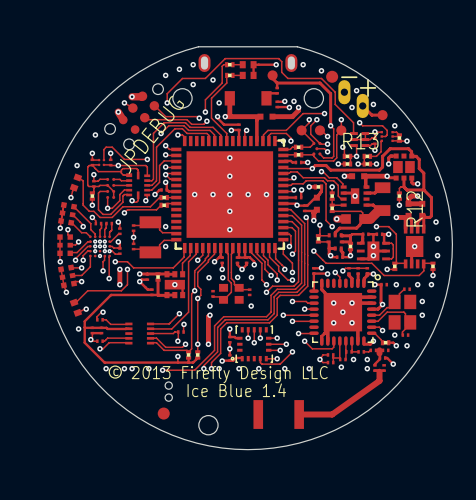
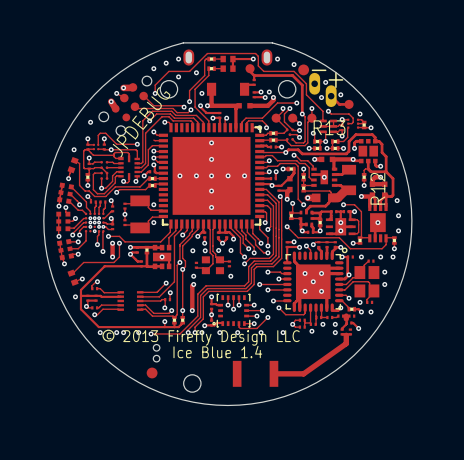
via: (165, 154) -> none

